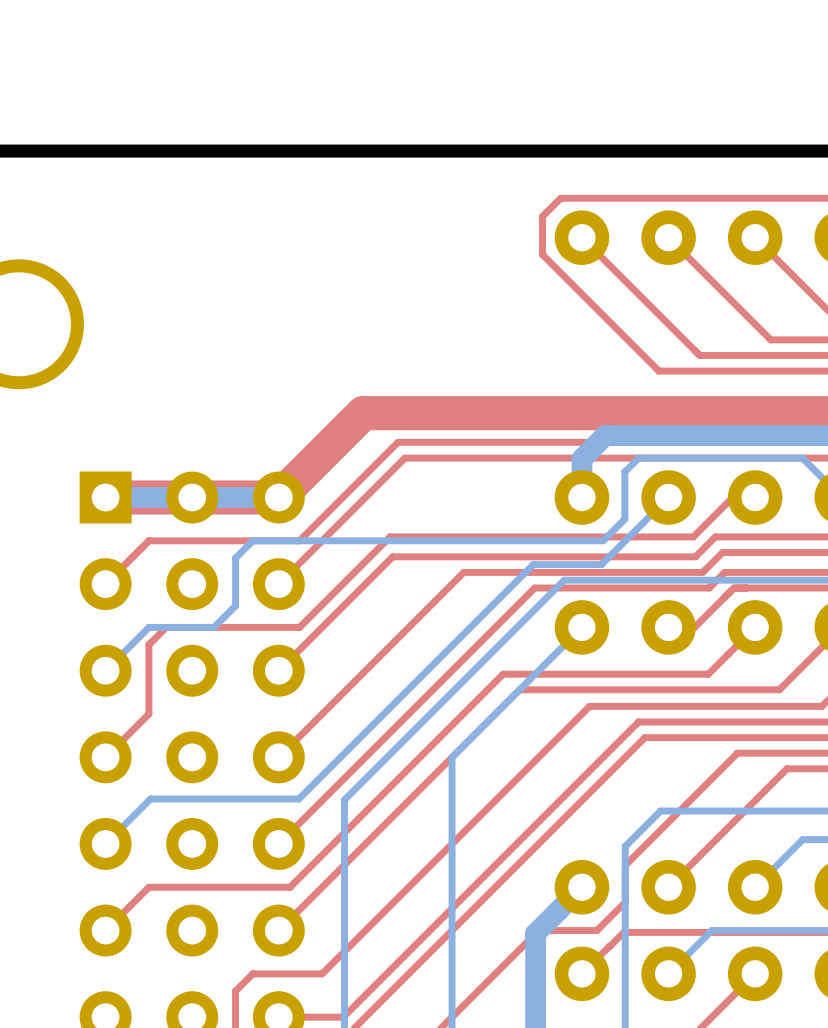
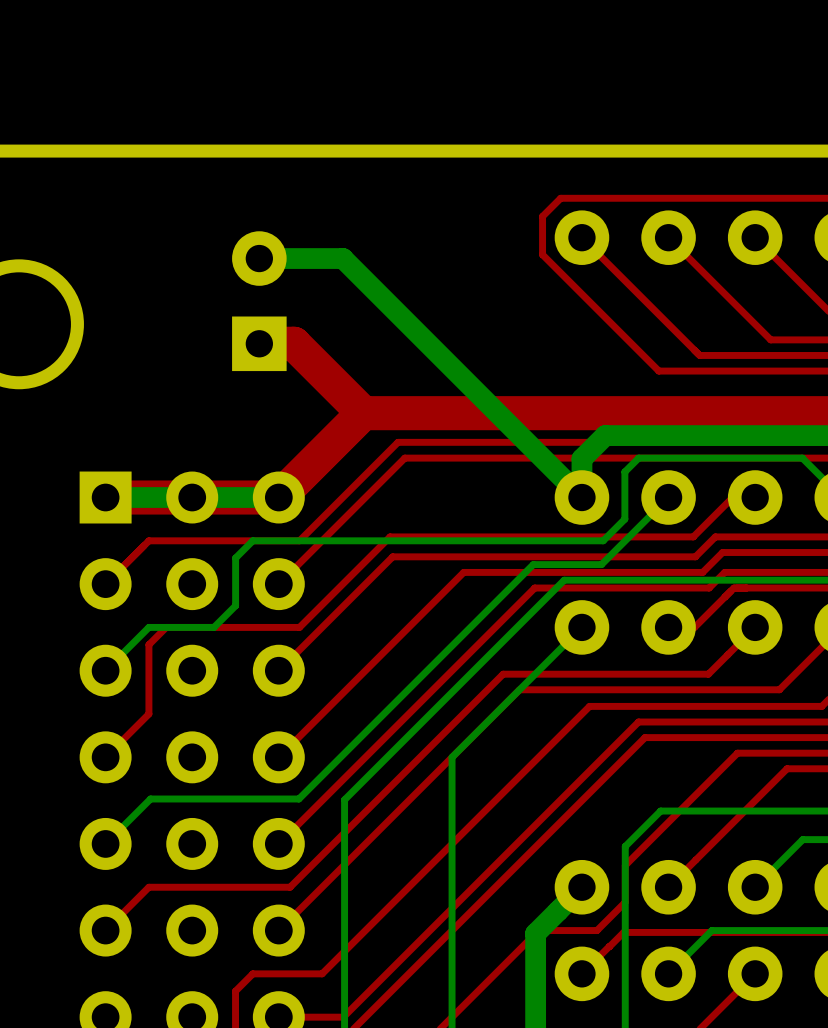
bottom track: none -> (259, 258) (342, 258) (581, 497)
part: none -> (259, 301)
top track: none -> (261, 343) (293, 343) (363, 412)

